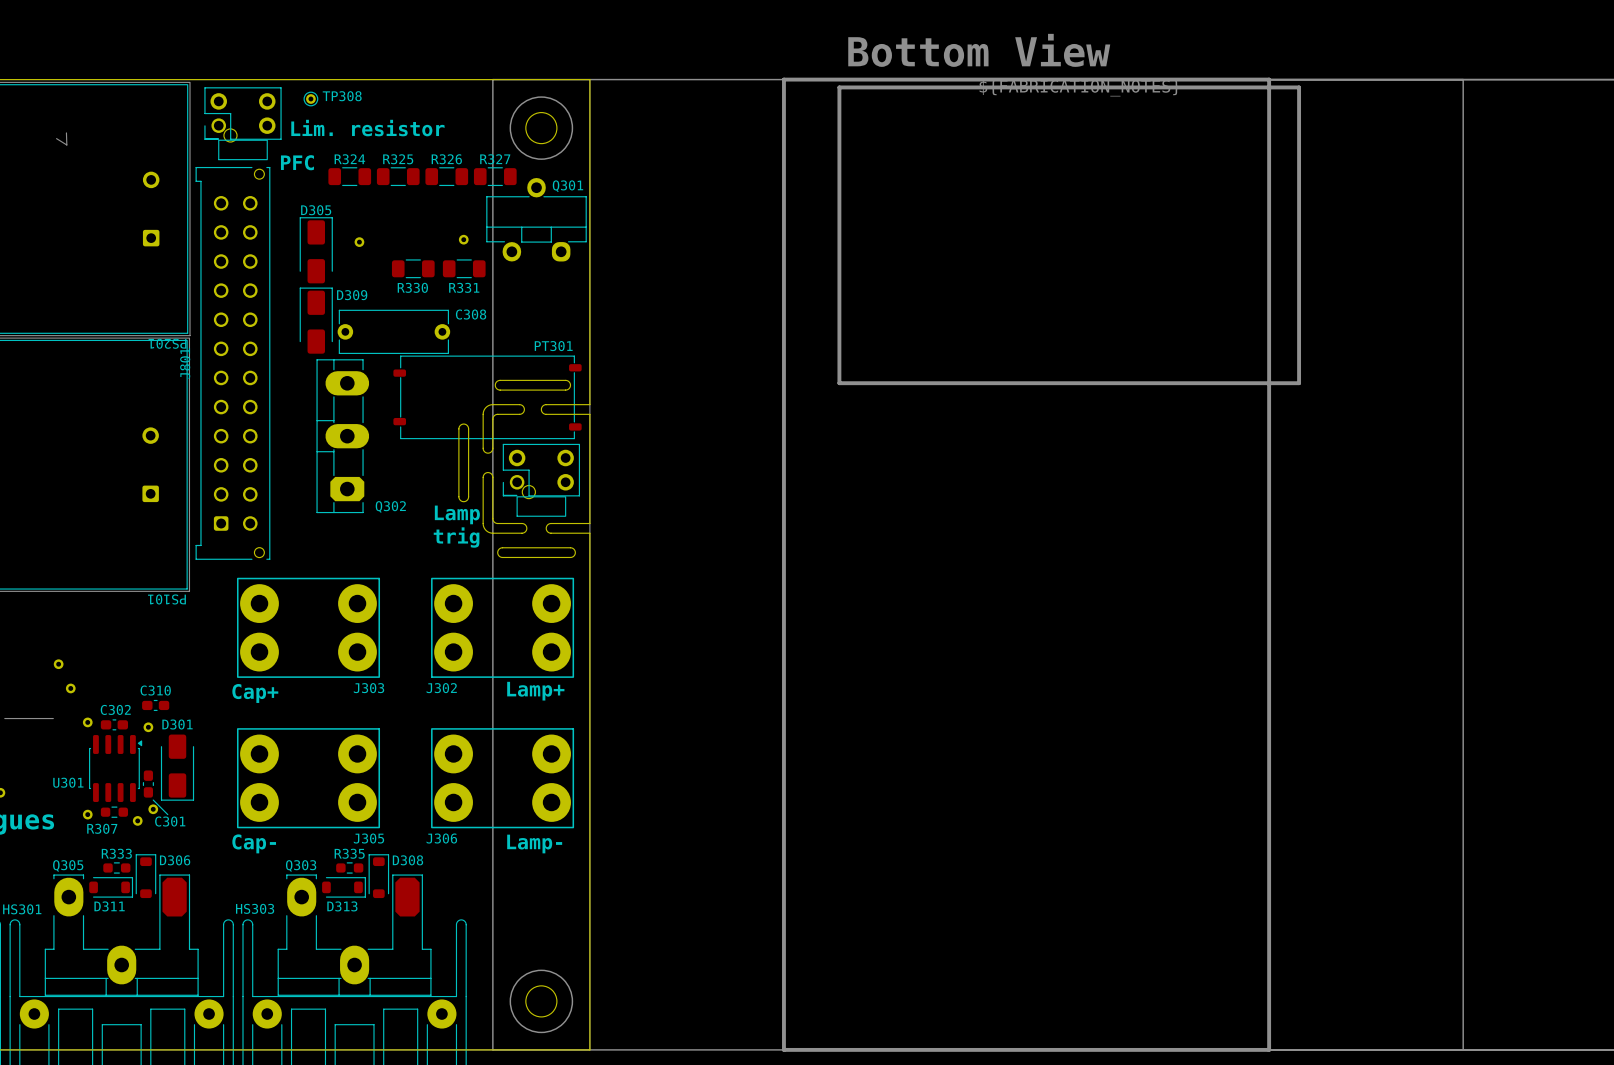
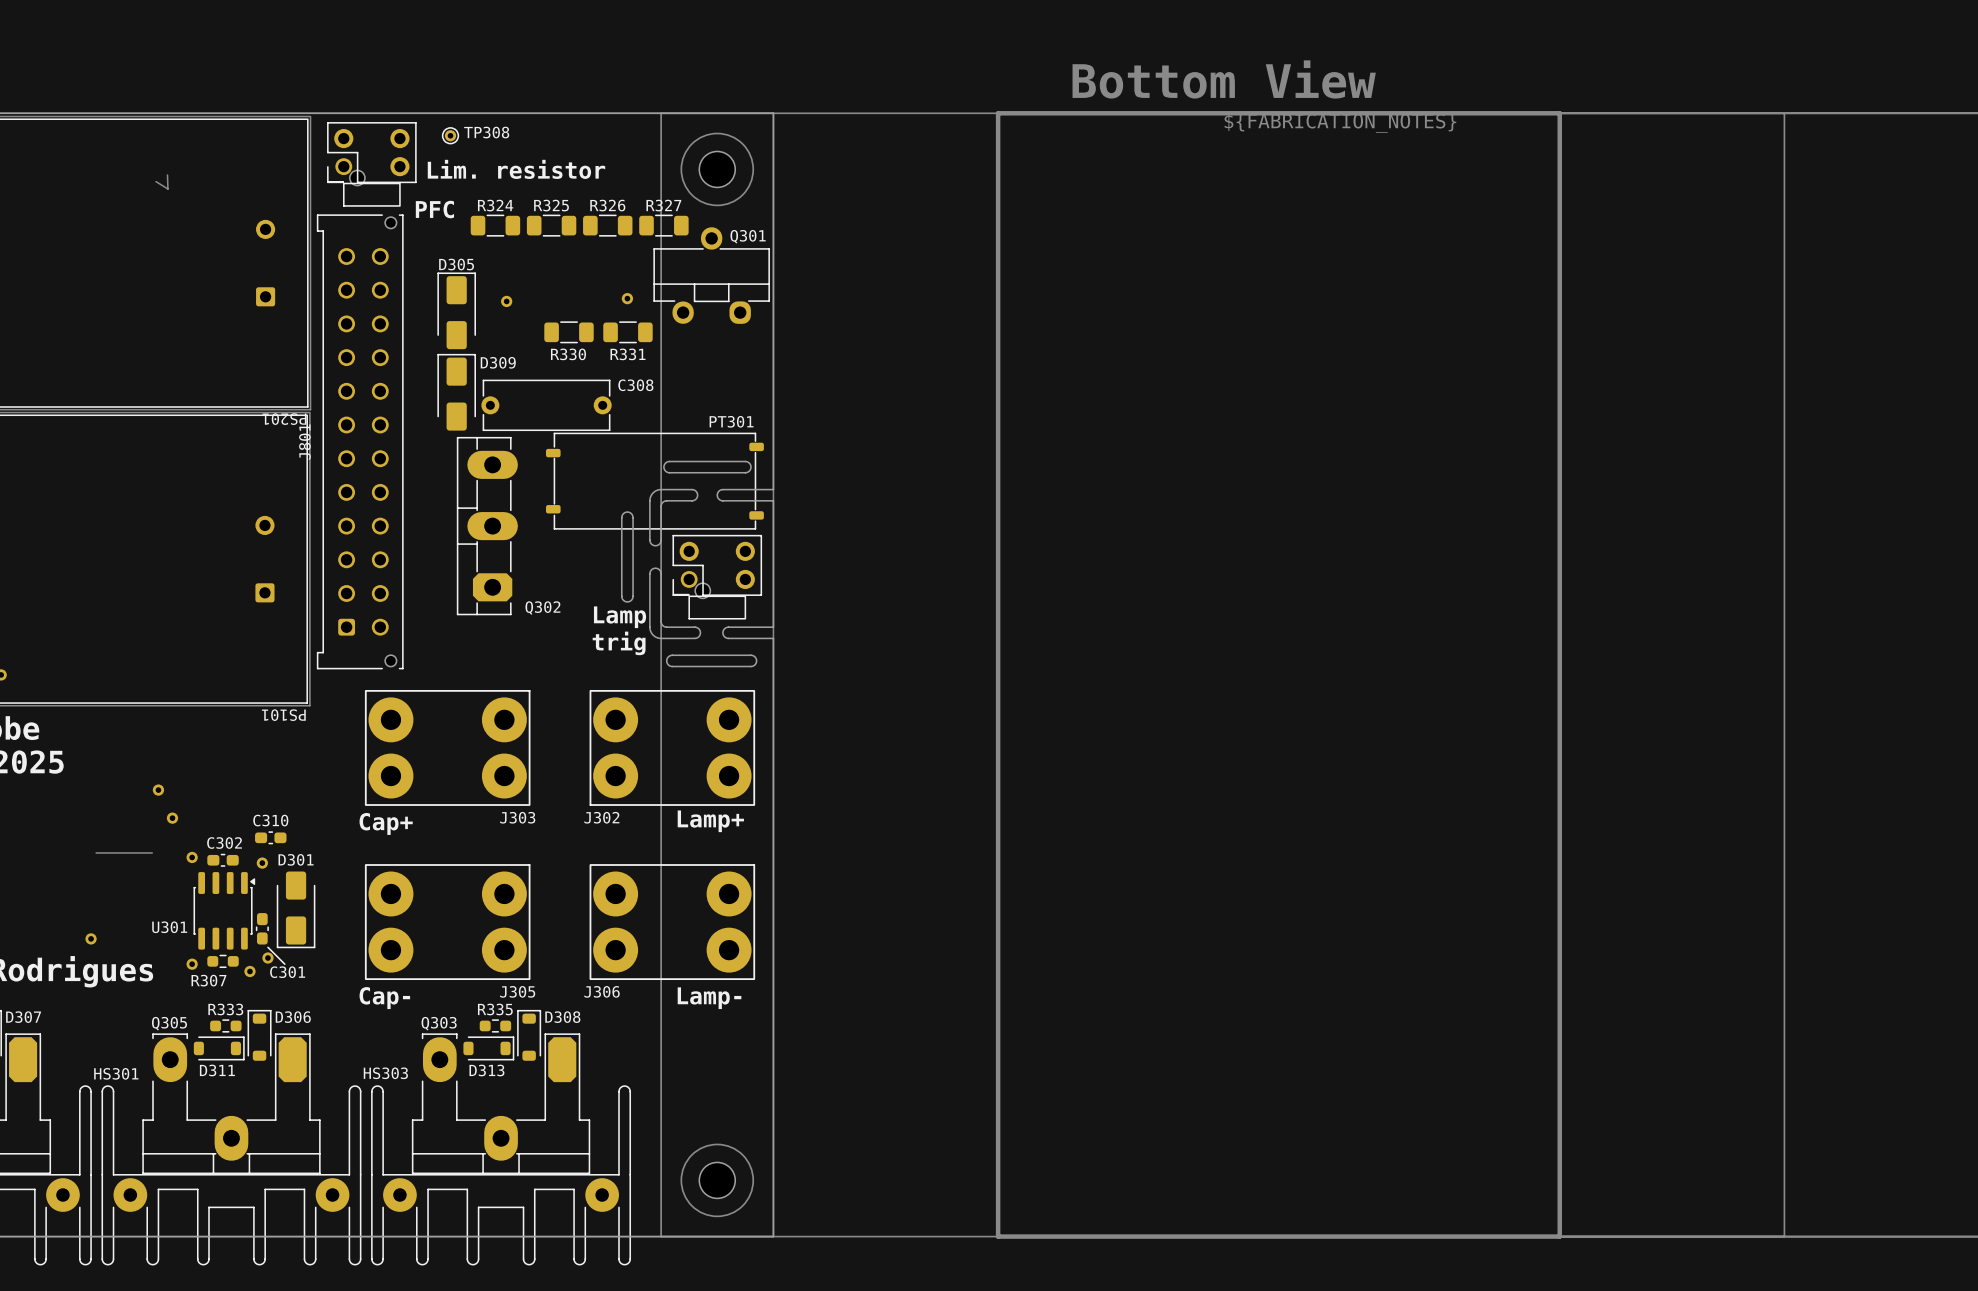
line: (839, 87) (1299, 87) (1299, 383) (839, 383) (839, 87) -> none

